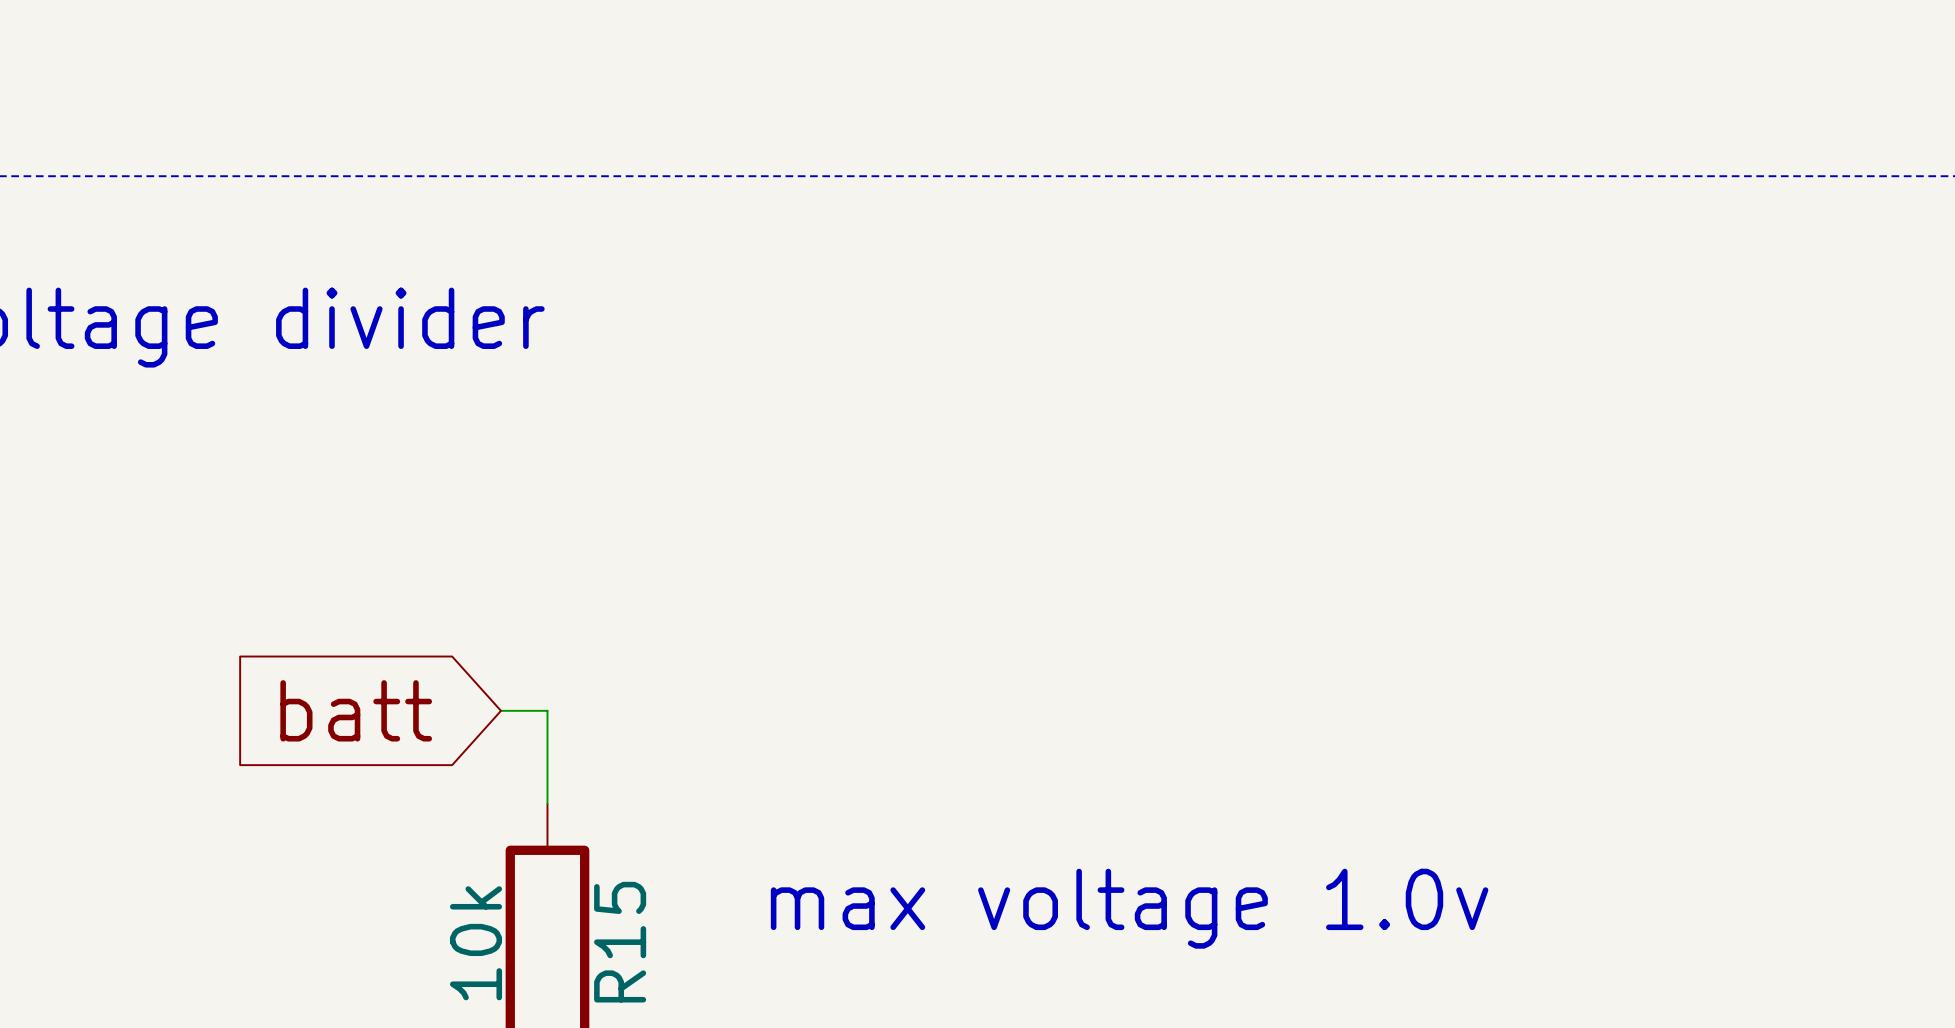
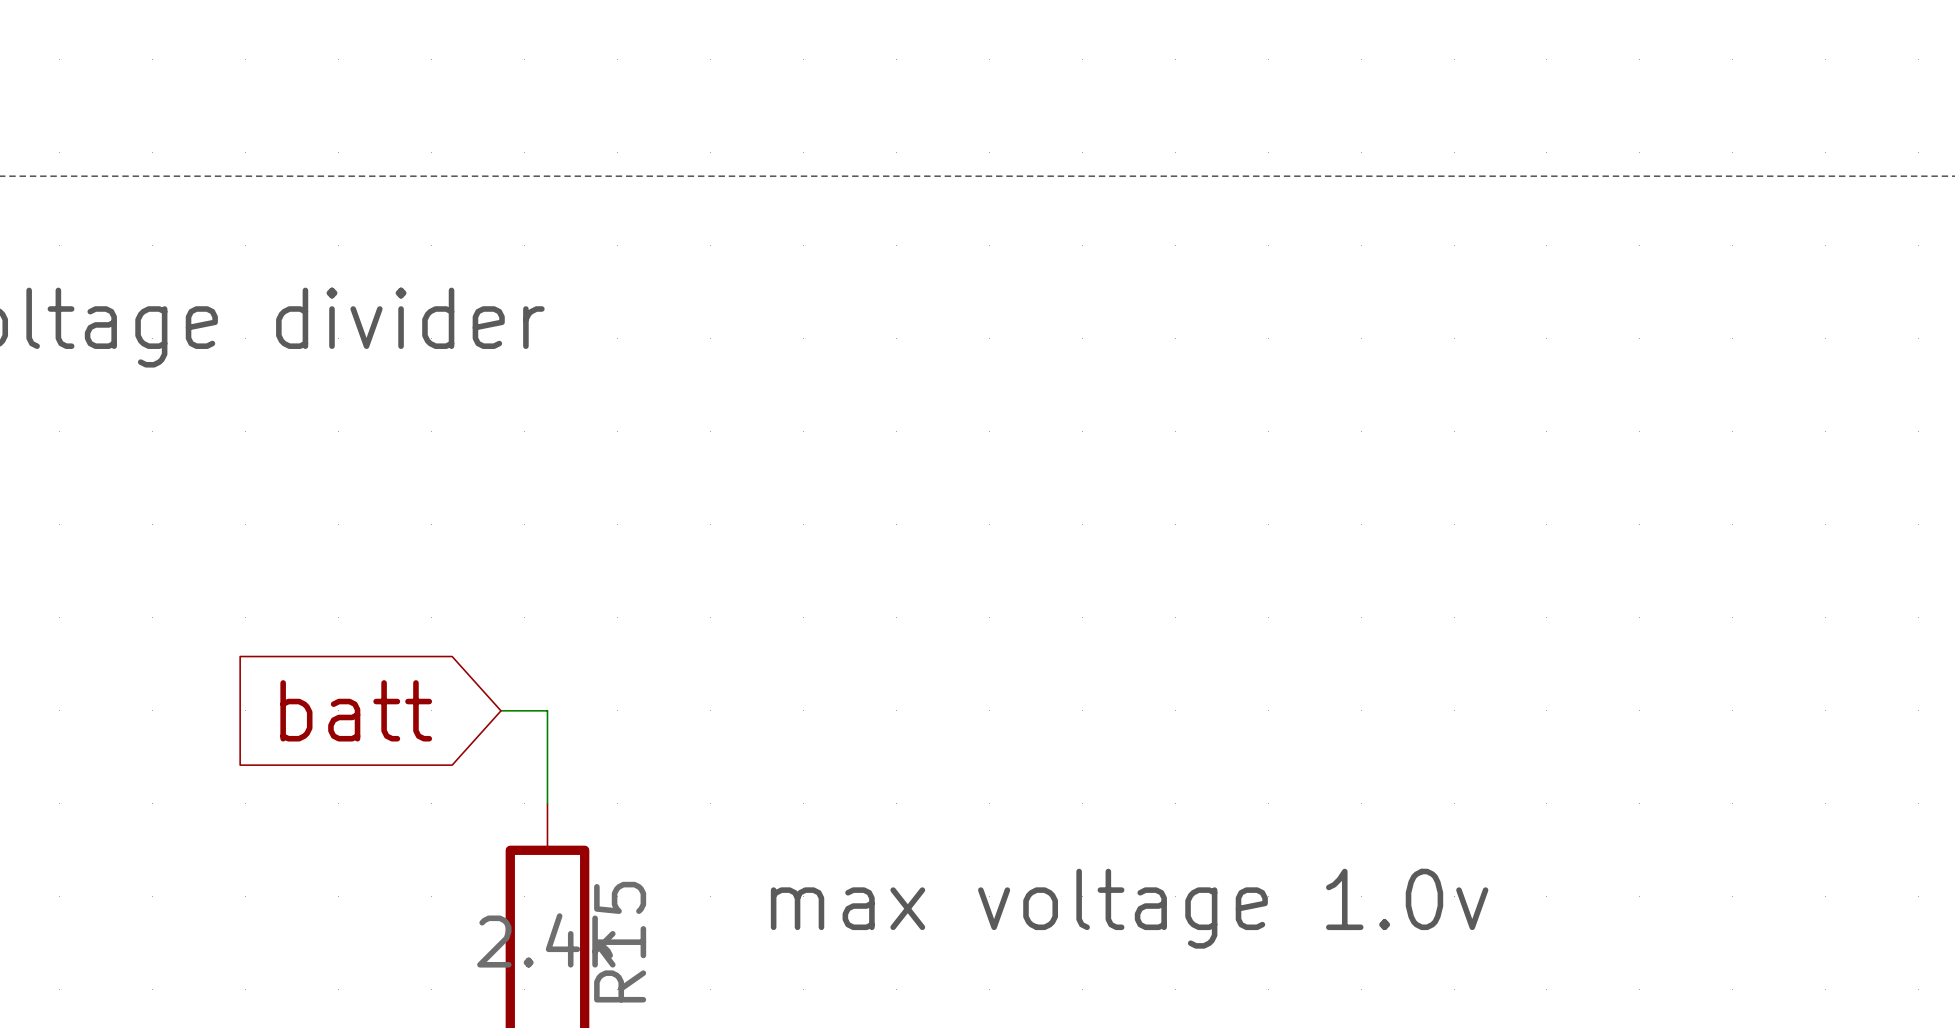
R15 value: 10k (476, 943) -> 2.4k (546, 940)

